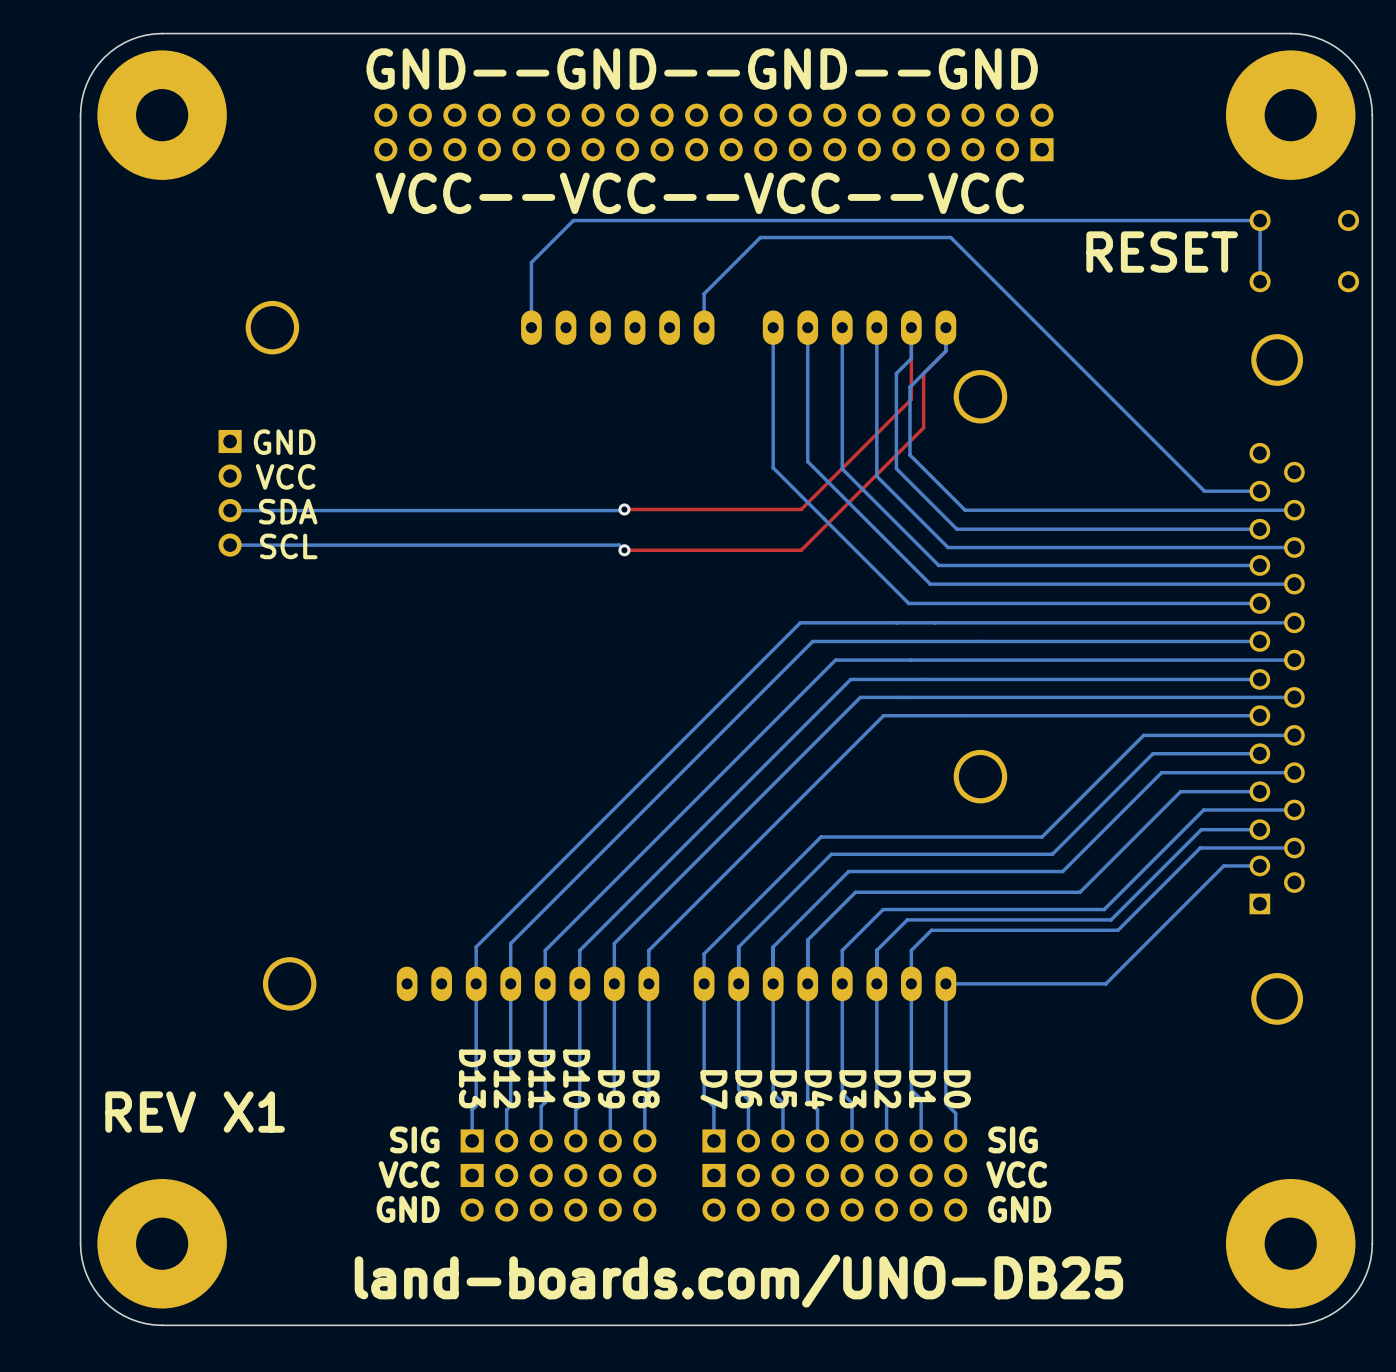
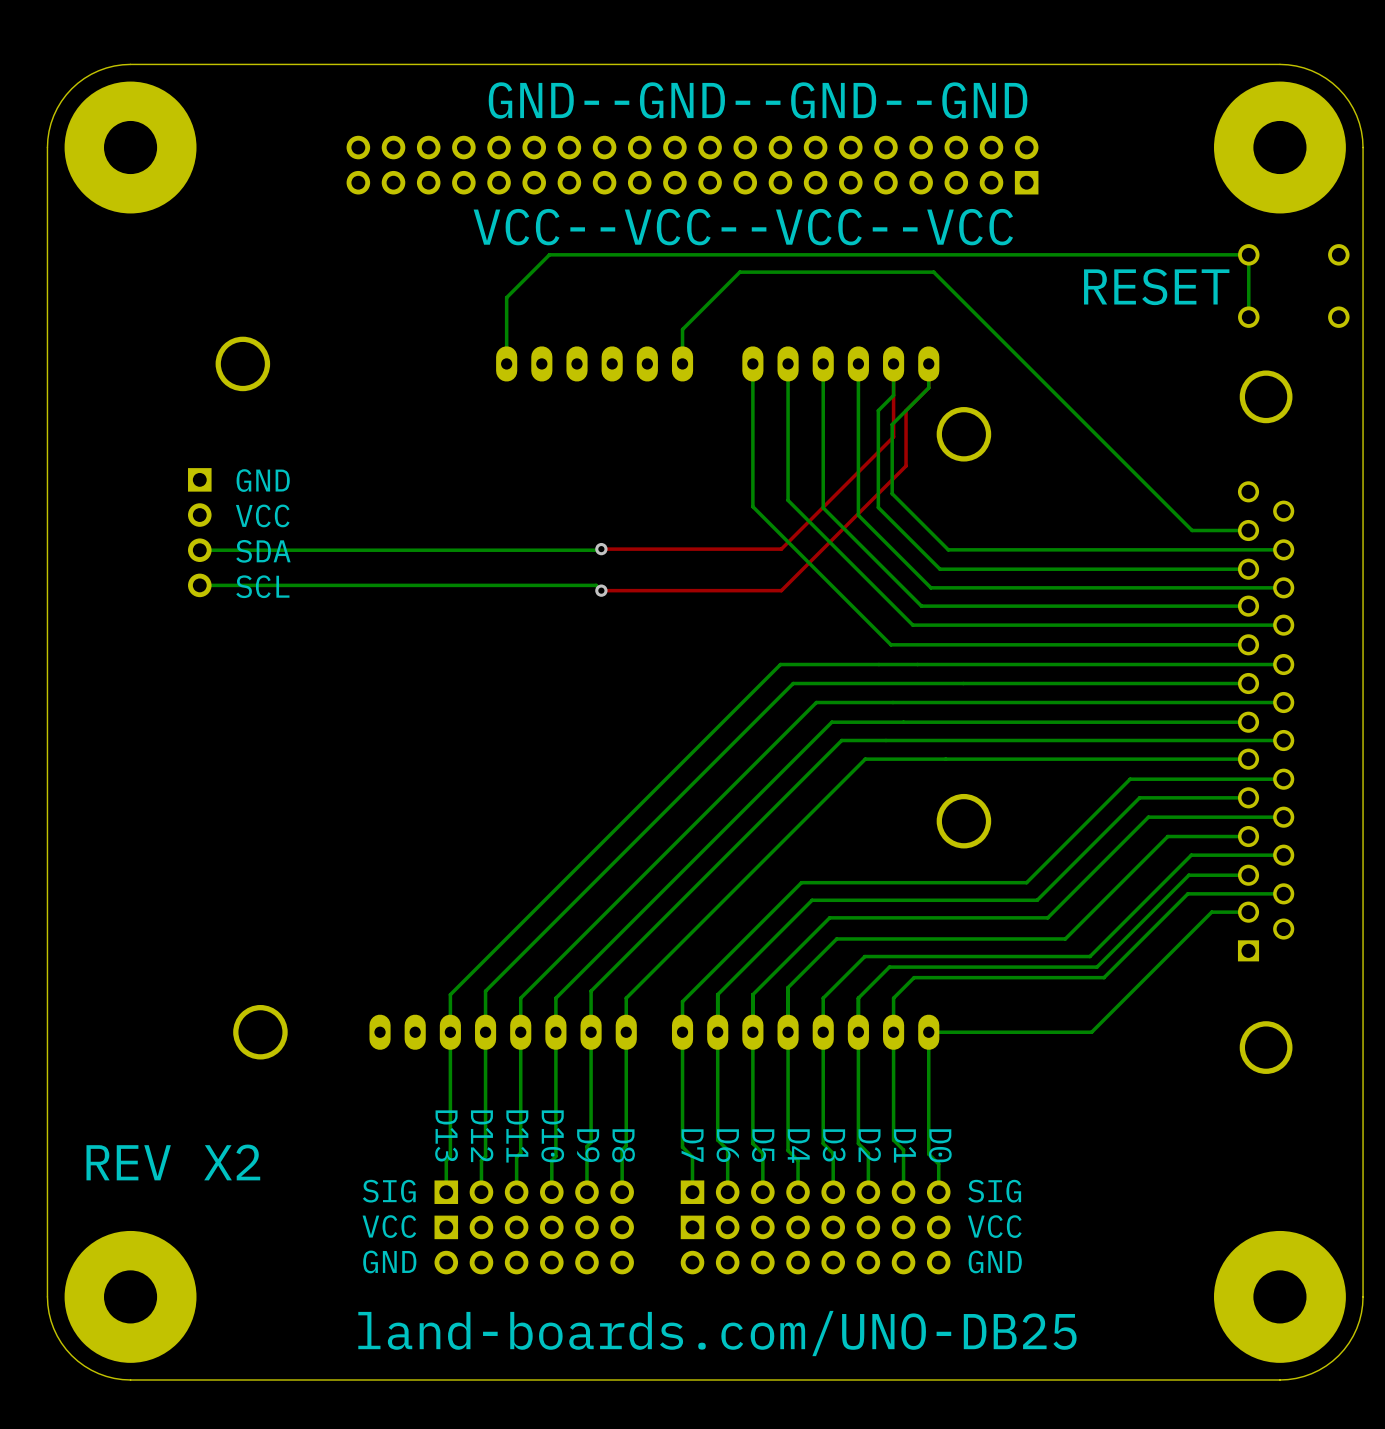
text: REV X1 (195, 1112) -> REV X2 (173, 1162)

